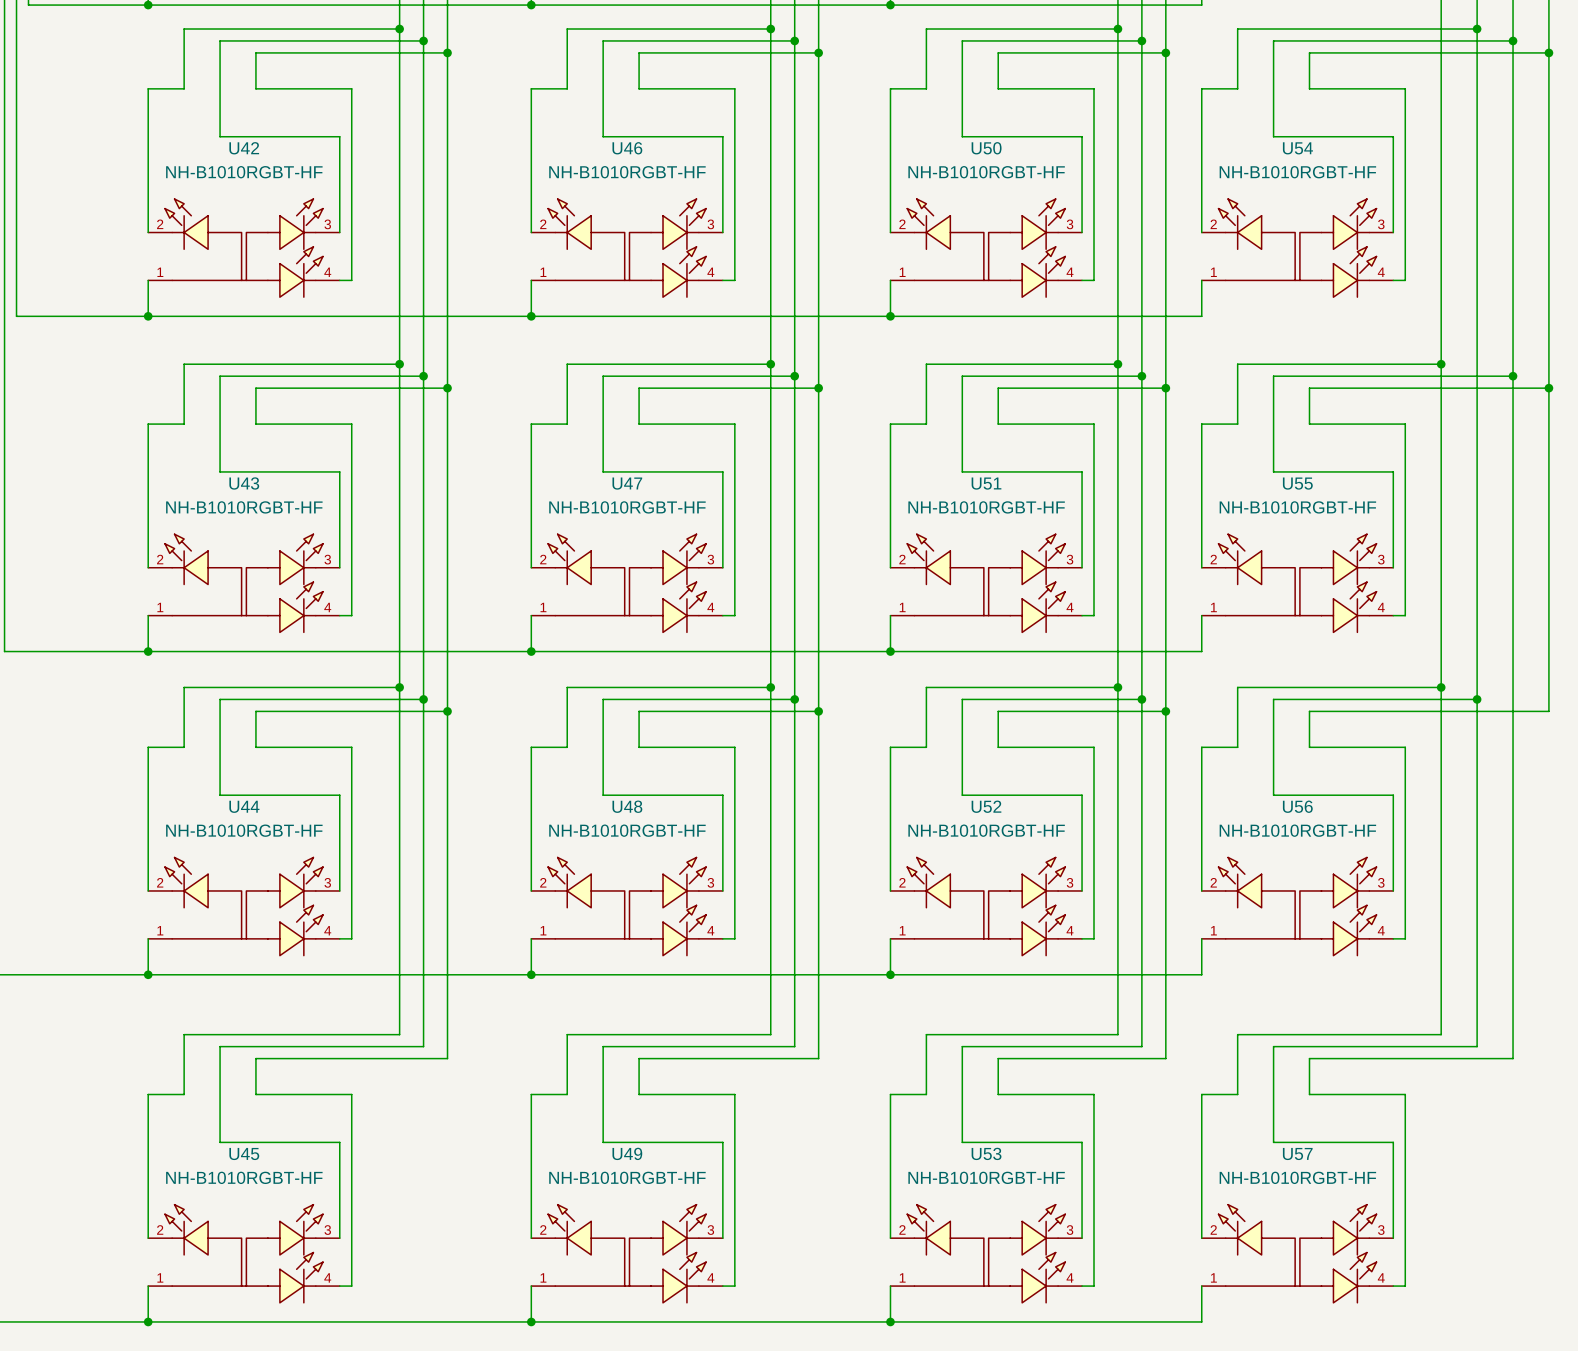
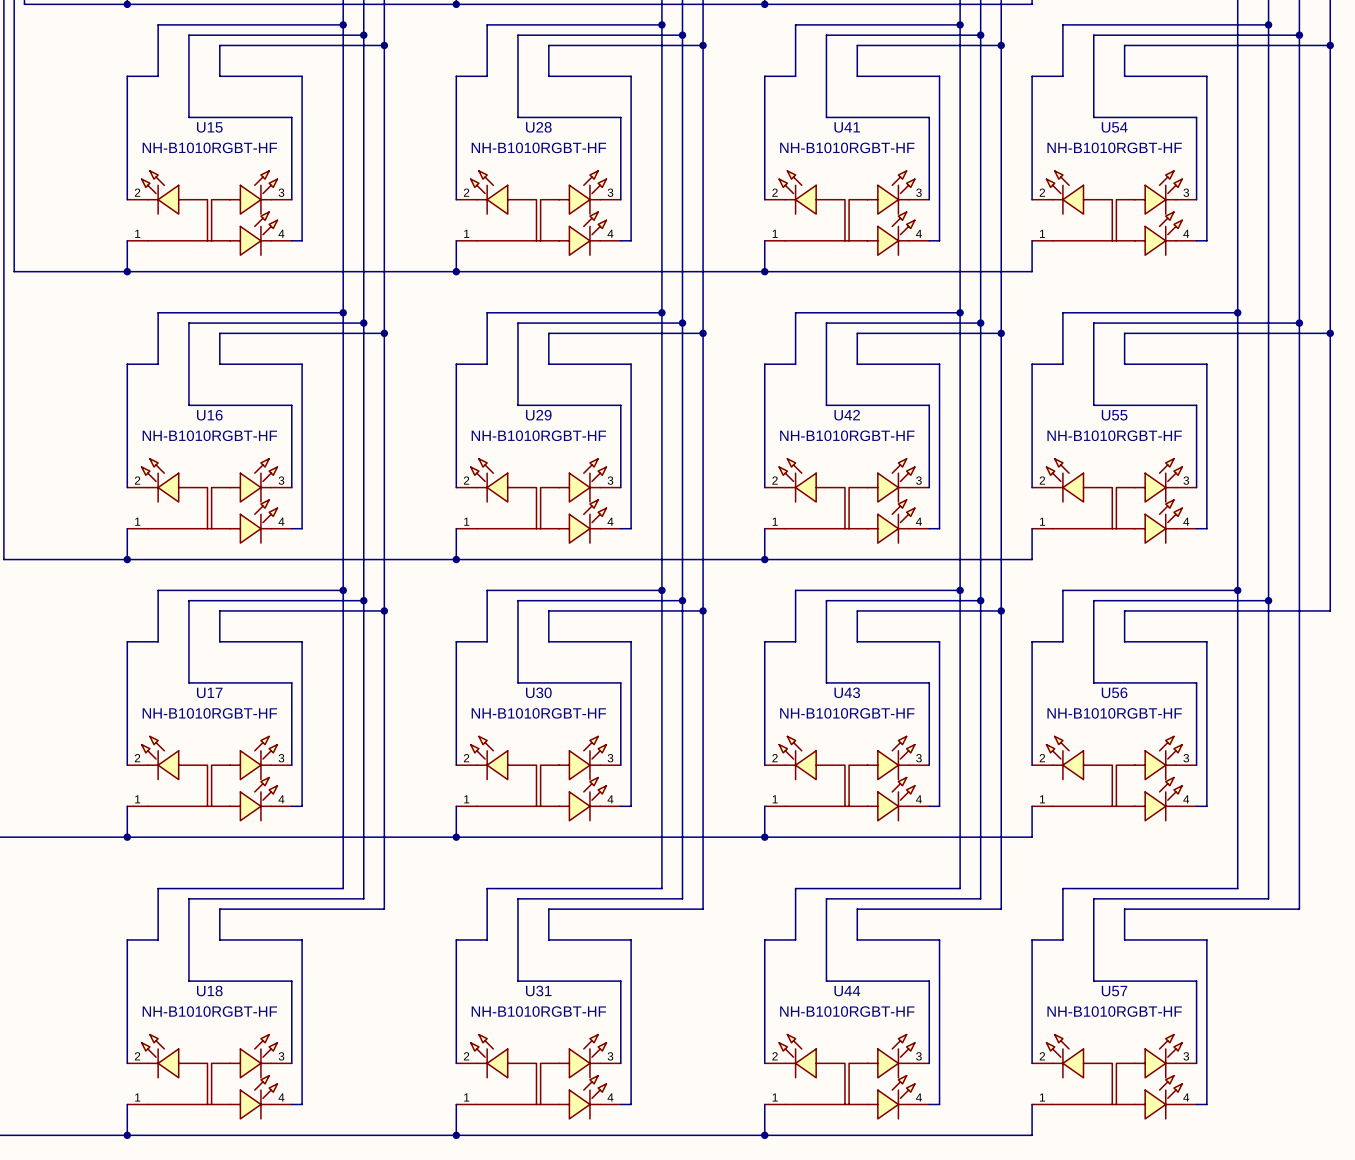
U42 name: U42 (244, 148) -> U15 (209, 127)
U46 name: U46 (627, 148) -> U28 (538, 127)
U50 name: U50 (986, 148) -> U41 (847, 127)
U43 name: U43 (244, 483) -> U16 (209, 415)
U47 name: U47 (627, 483) -> U29 (538, 415)
U51 name: U51 (986, 483) -> U42 (847, 415)
U44 name: U44 (244, 806) -> U17 (209, 692)
U48 name: U48 (627, 806) -> U30 (538, 692)
U52 name: U52 (986, 806) -> U43 (847, 692)
U49 name: U49 (627, 1153) -> U31 (538, 991)
U53 name: U53 (986, 1153) -> U44 (847, 991)
U45 name: U45 (244, 1154) -> U18 (209, 991)

